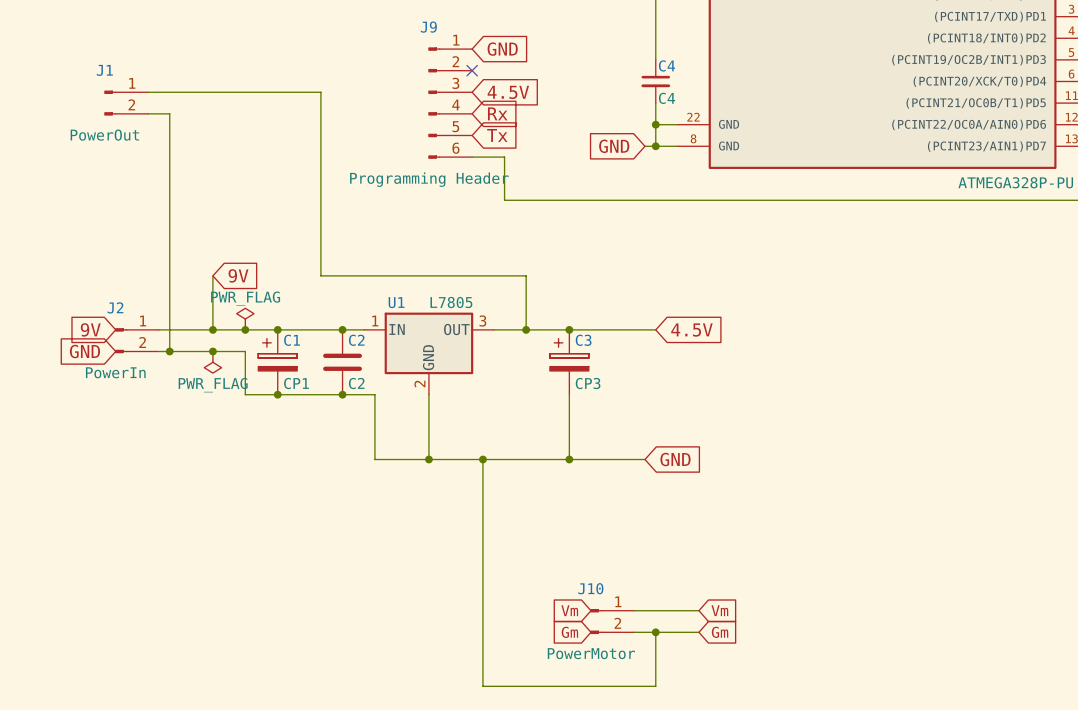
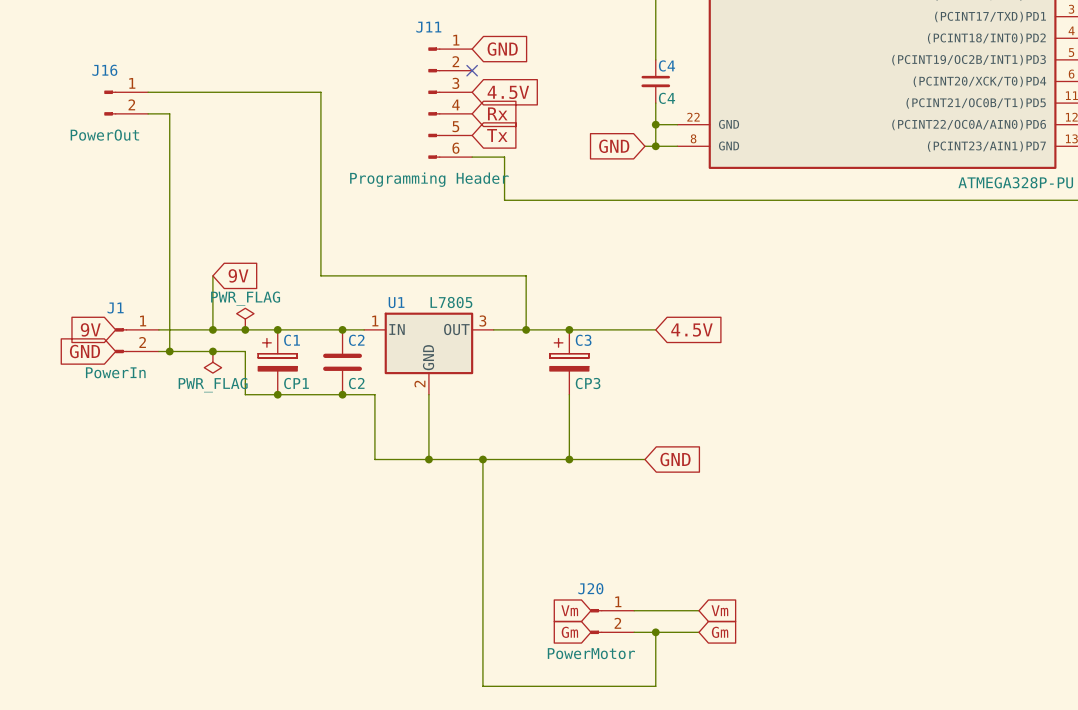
J9 name: J9 (428, 27) -> J11 (428, 27)
J1 name: J1 (104, 70) -> J16 (104, 70)
J2 name: J2 (115, 307) -> J1 (115, 308)
J10 name: J10 (590, 588) -> J20 (590, 588)

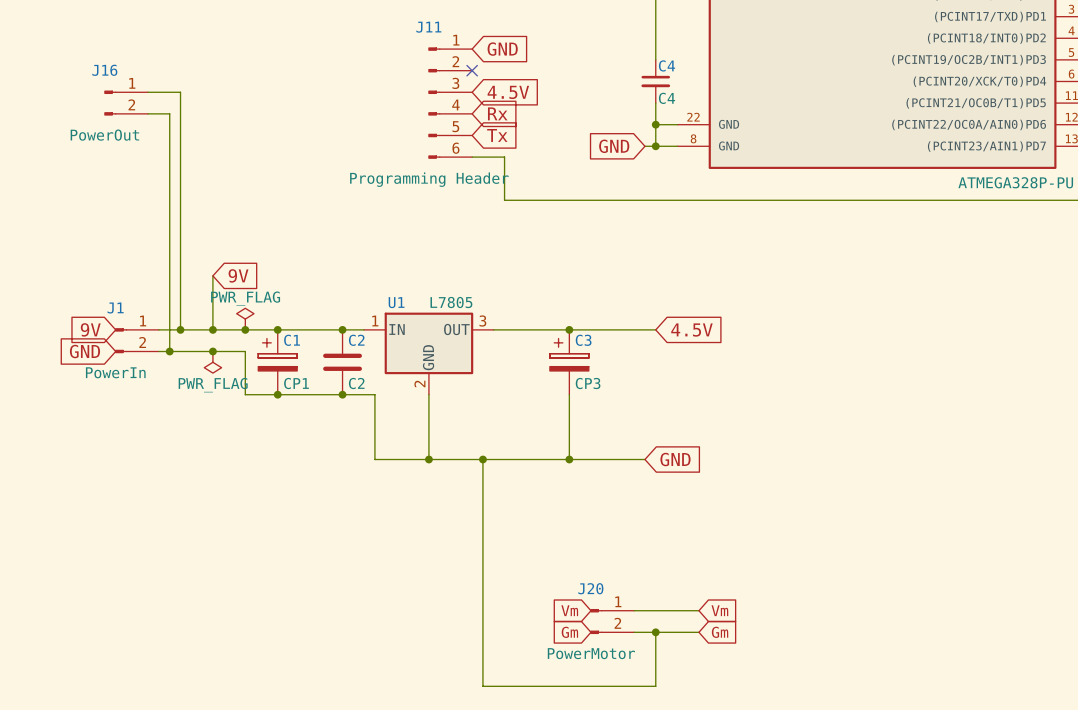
wire: (180, 92) (320, 92) (320, 275) (526, 275) (526, 329) -> (180, 92) (180, 329)
junction: none -> (180, 329)
junction: (526, 329) -> none

